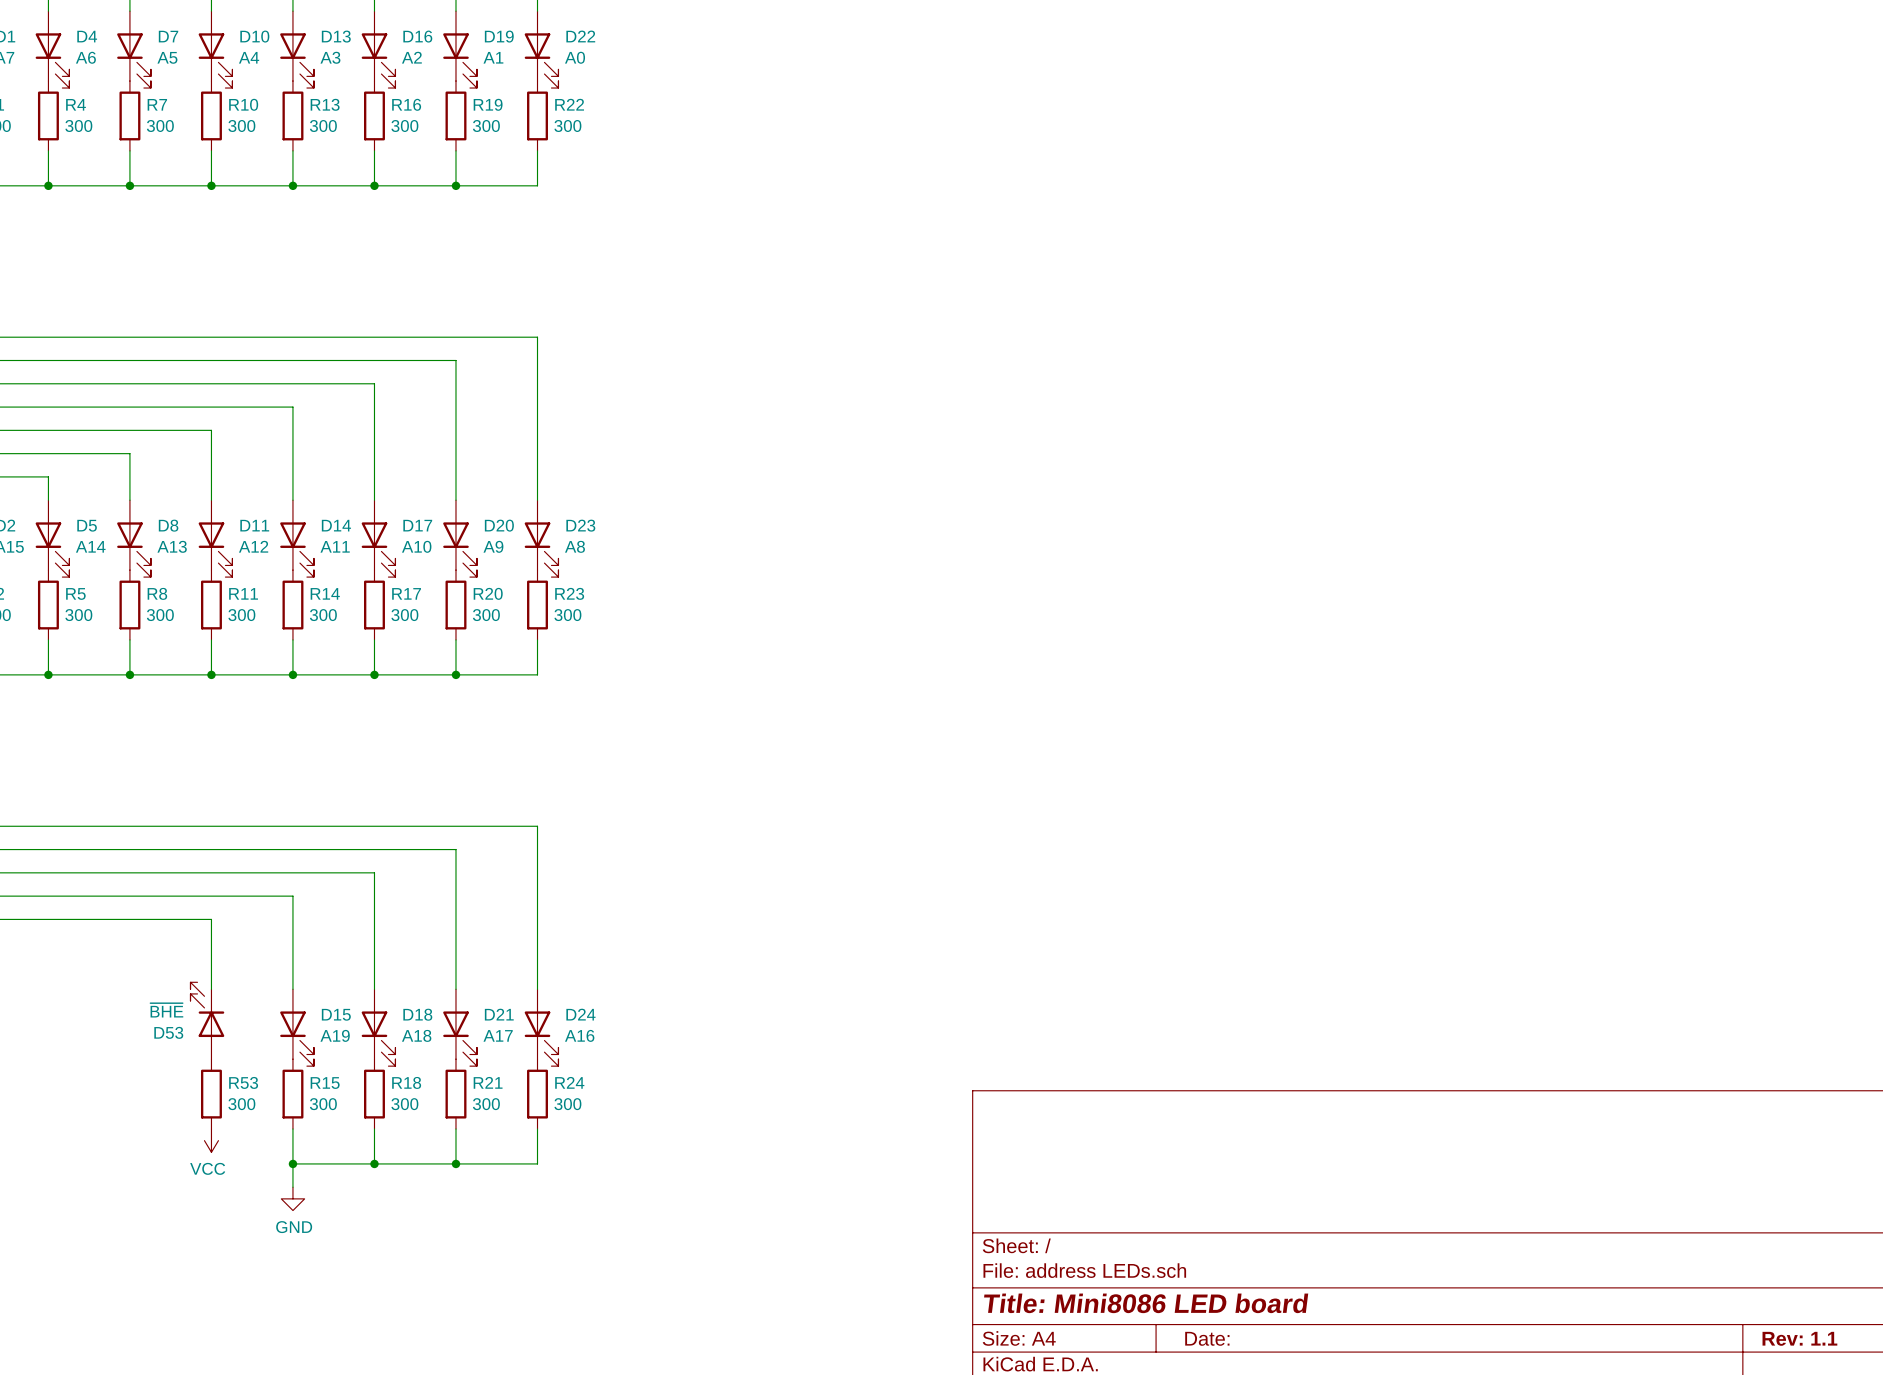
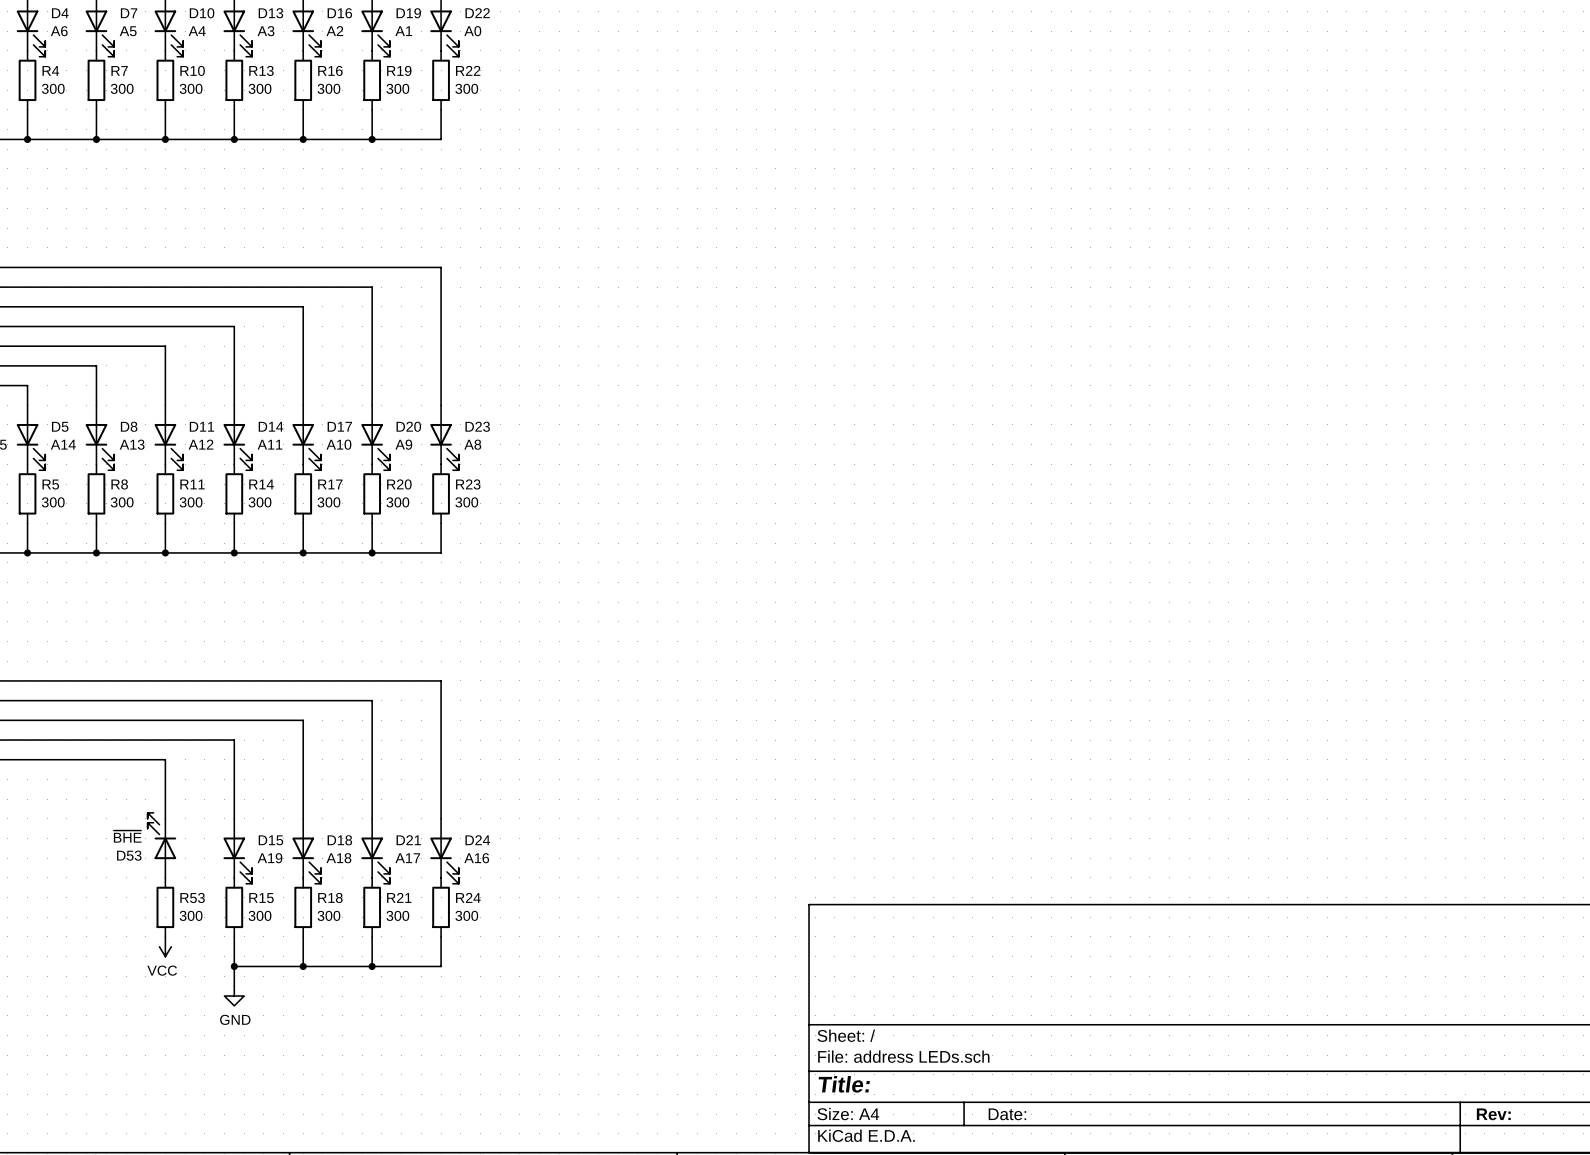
title block: Title: Mini8086 LED board (1146, 1303) -> Title: (844, 1084)
title block: Rev: 1.1 (1799, 1338) -> Rev: (1493, 1114)

